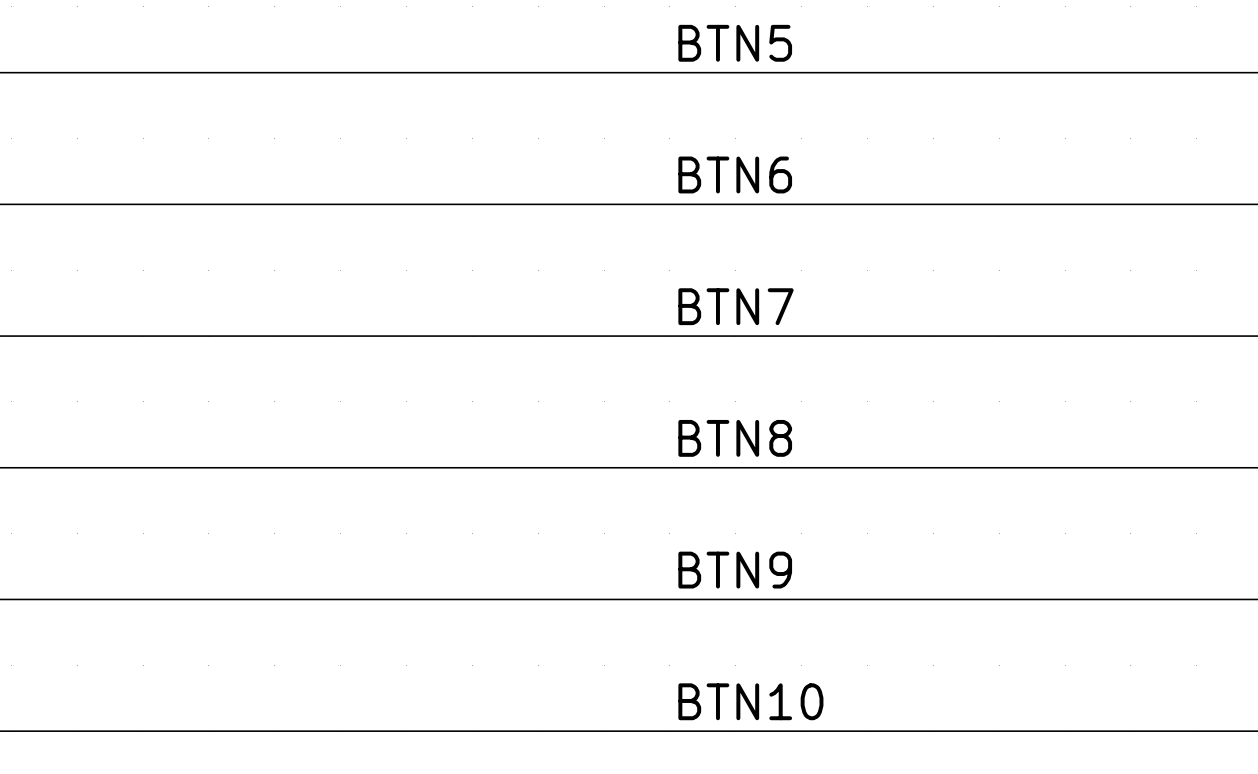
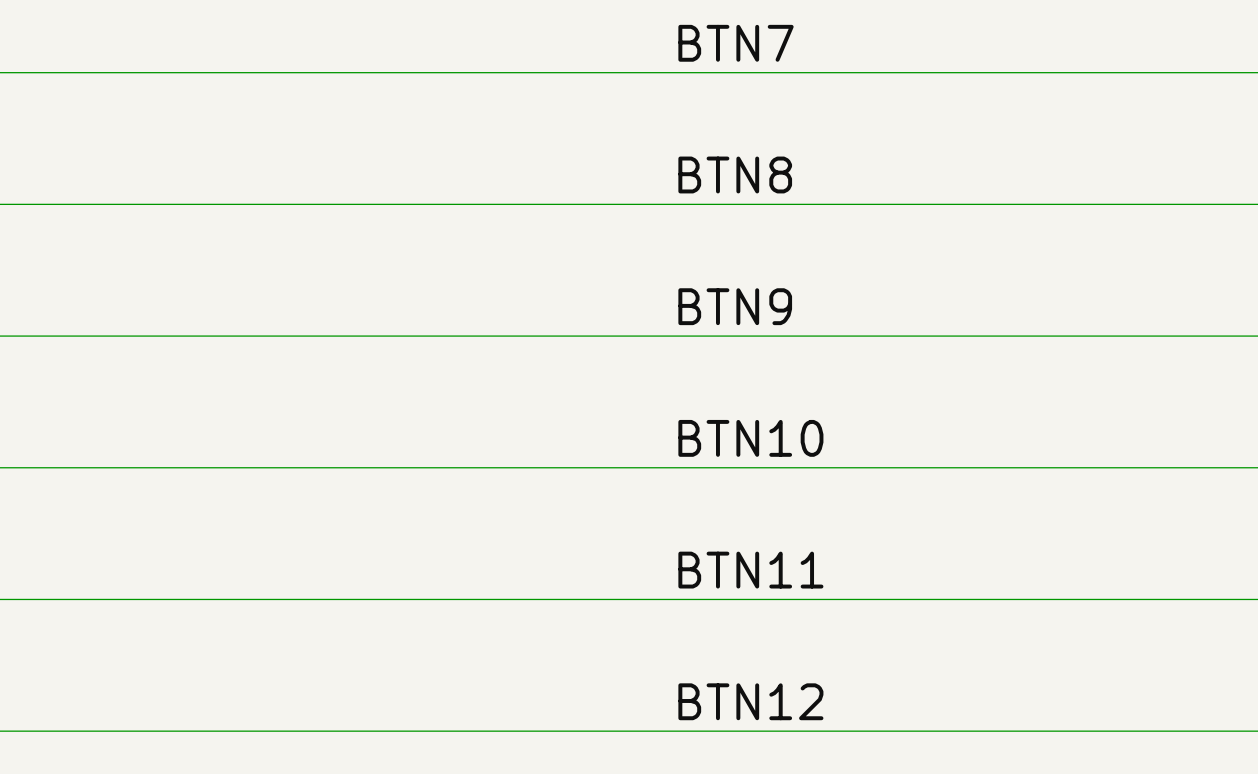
label: BTN5 (735, 43) -> BTN7 (736, 43)
label: BTN6 (735, 174) -> BTN8 (735, 174)
label: BTN7 (736, 306) -> BTN9 (735, 306)
label: BTN8 (735, 438) -> BTN10 (750, 438)
label: BTN9 (735, 570) -> BTN11 (750, 570)
label: BTN10 (750, 701) -> BTN12 (750, 701)

